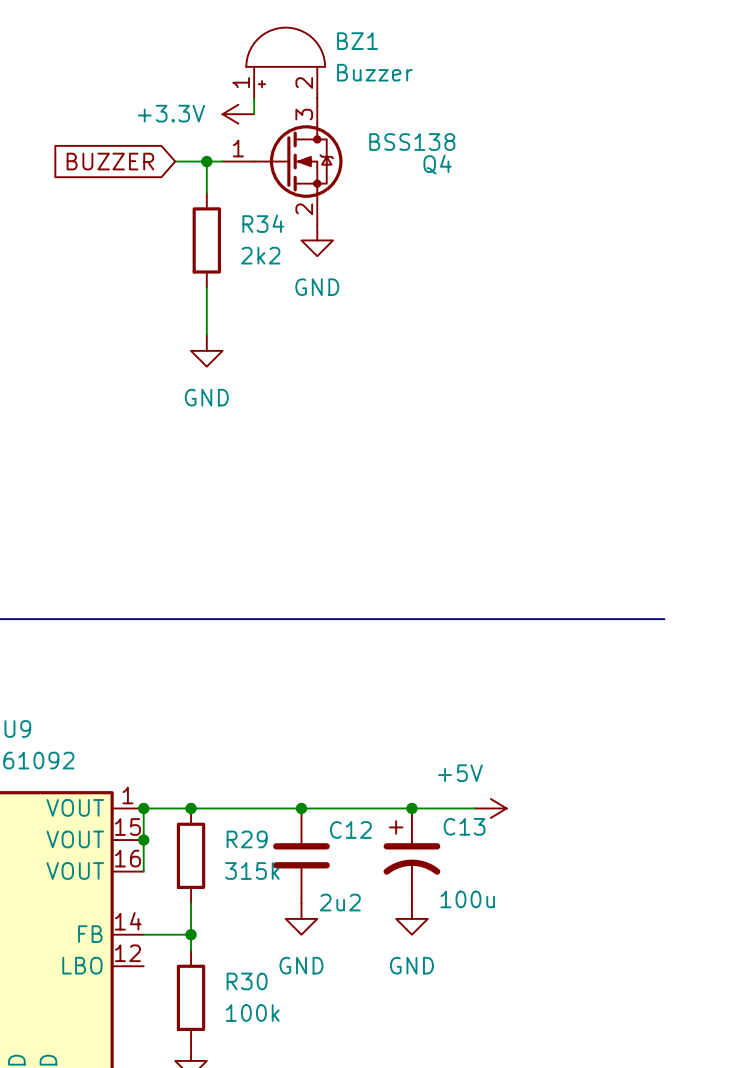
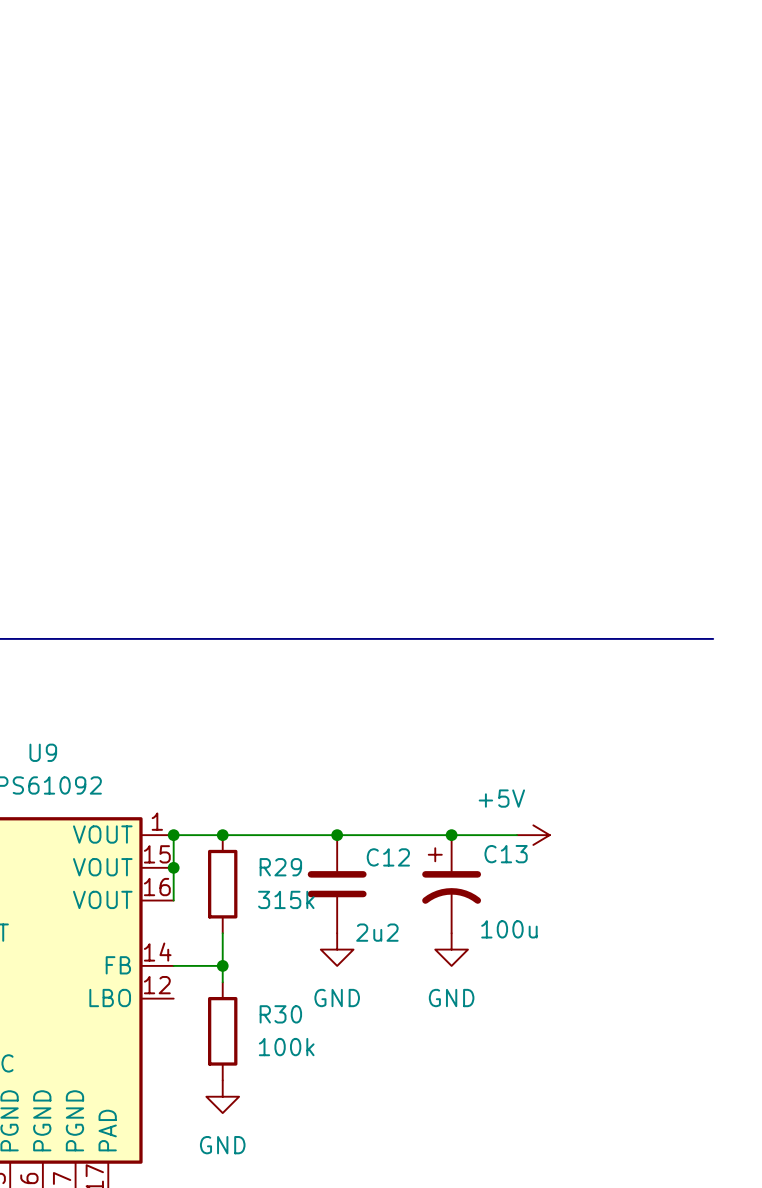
BZ1: Buzzer (285, 63) -> none
wire: (254, 98) (254, 114) -> none
power symbol: +3.3V (238, 114) -> none
global label: BUZZER (110, 161) -> none
wire: (175, 161) (222, 161) -> none
wire: (206, 161) (206, 193) -> none
junction: (206, 161) -> none
Q4: BSS138 (282, 161) -> none
R34: 2k2 (206, 240) -> none
power symbol: GND (317, 240) -> none
wire: (206, 287) (206, 335) -> none
power symbol: GND (206, 350) -> none

